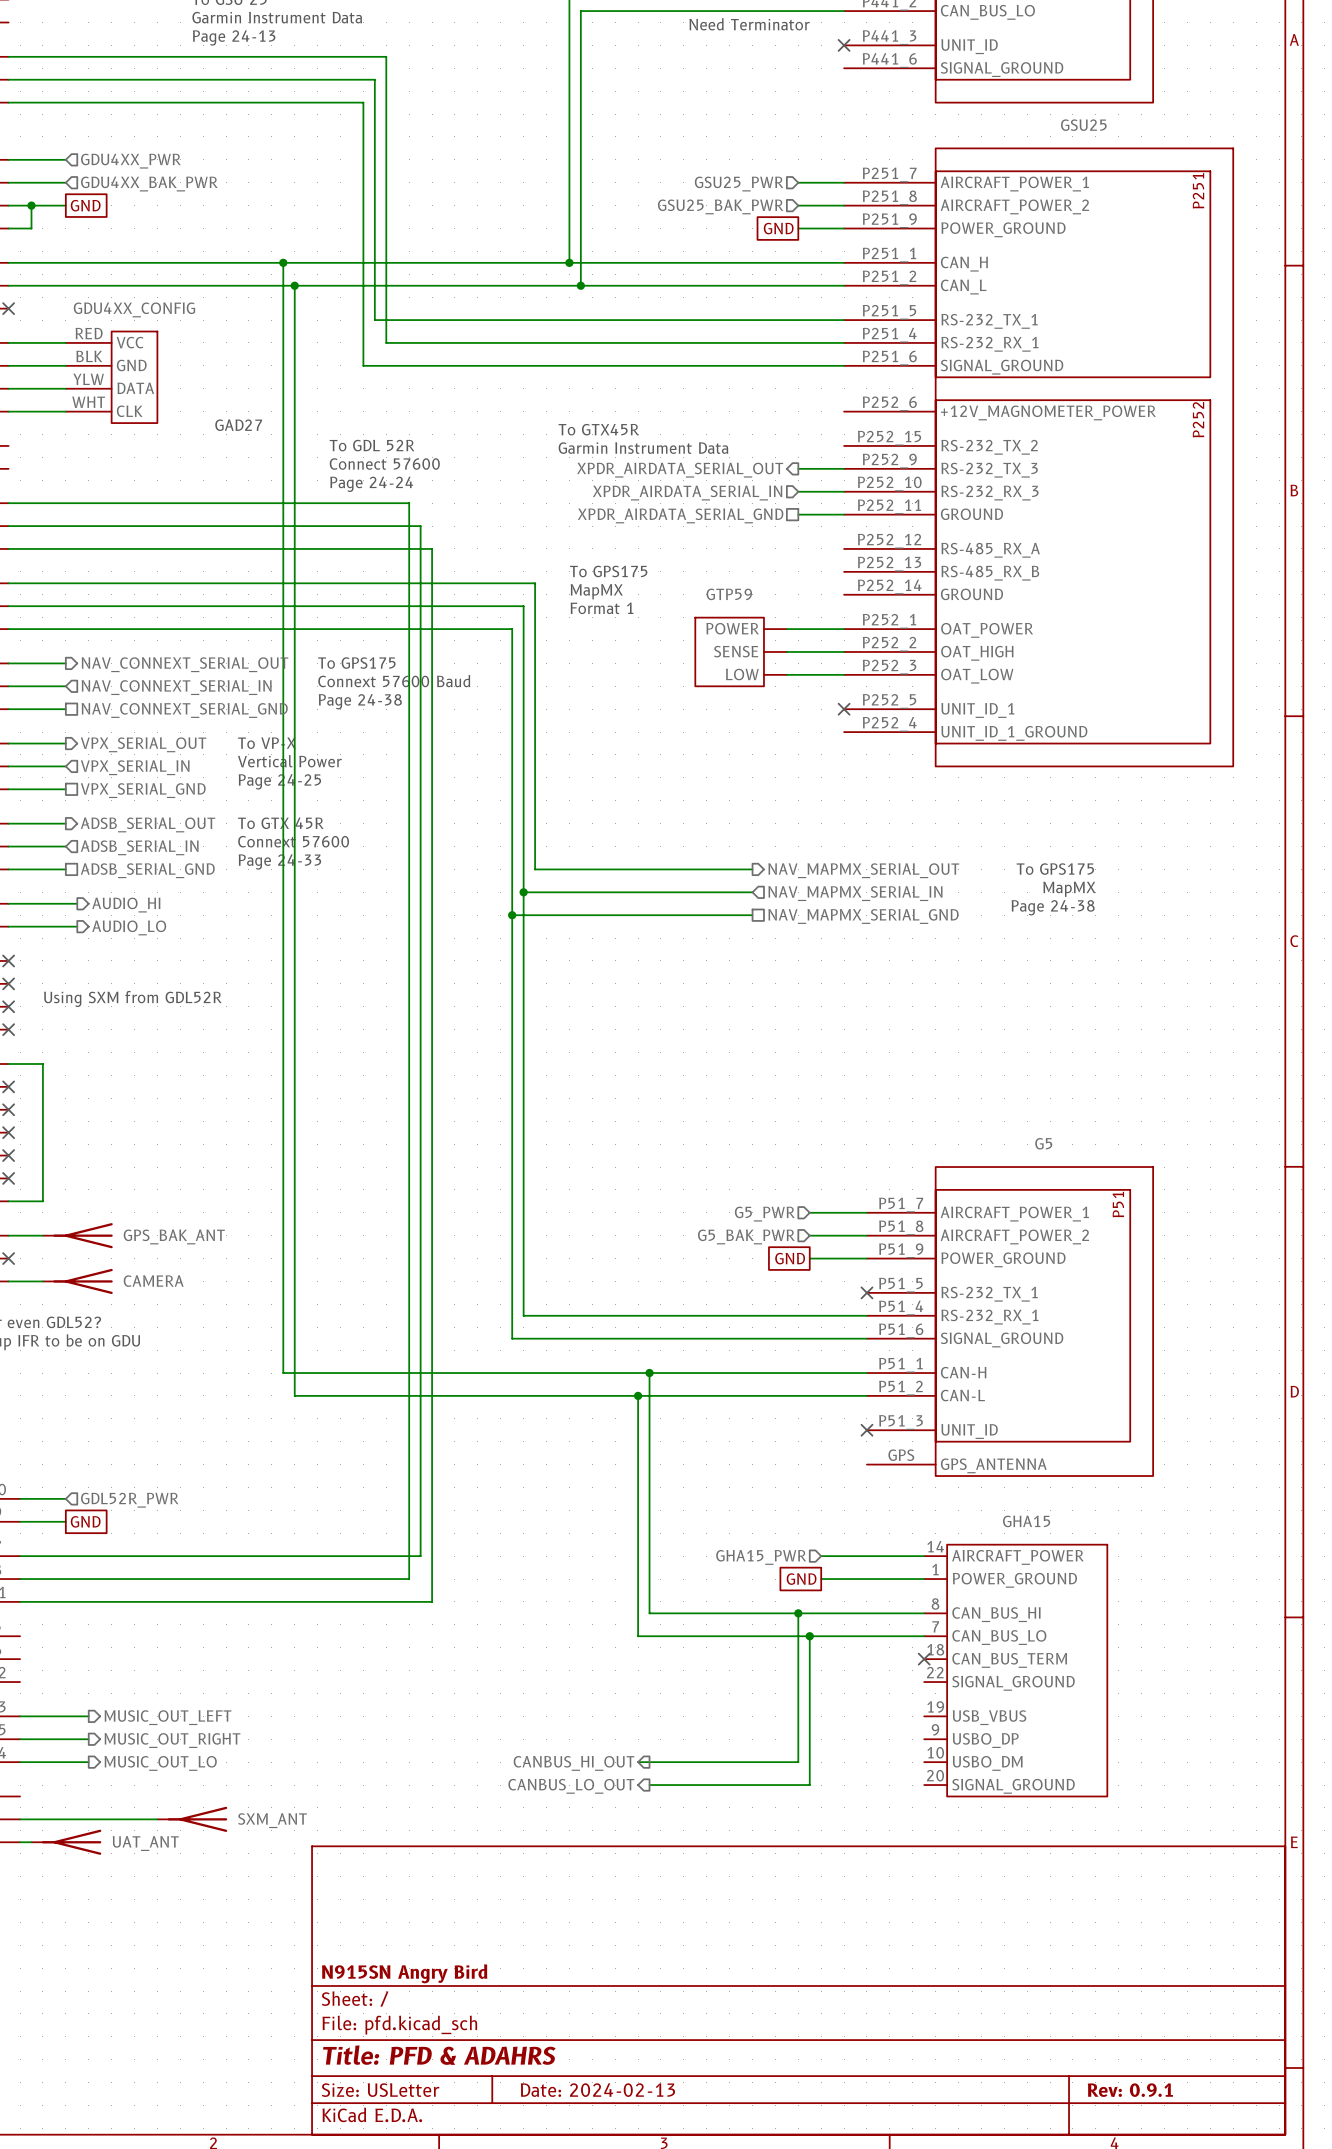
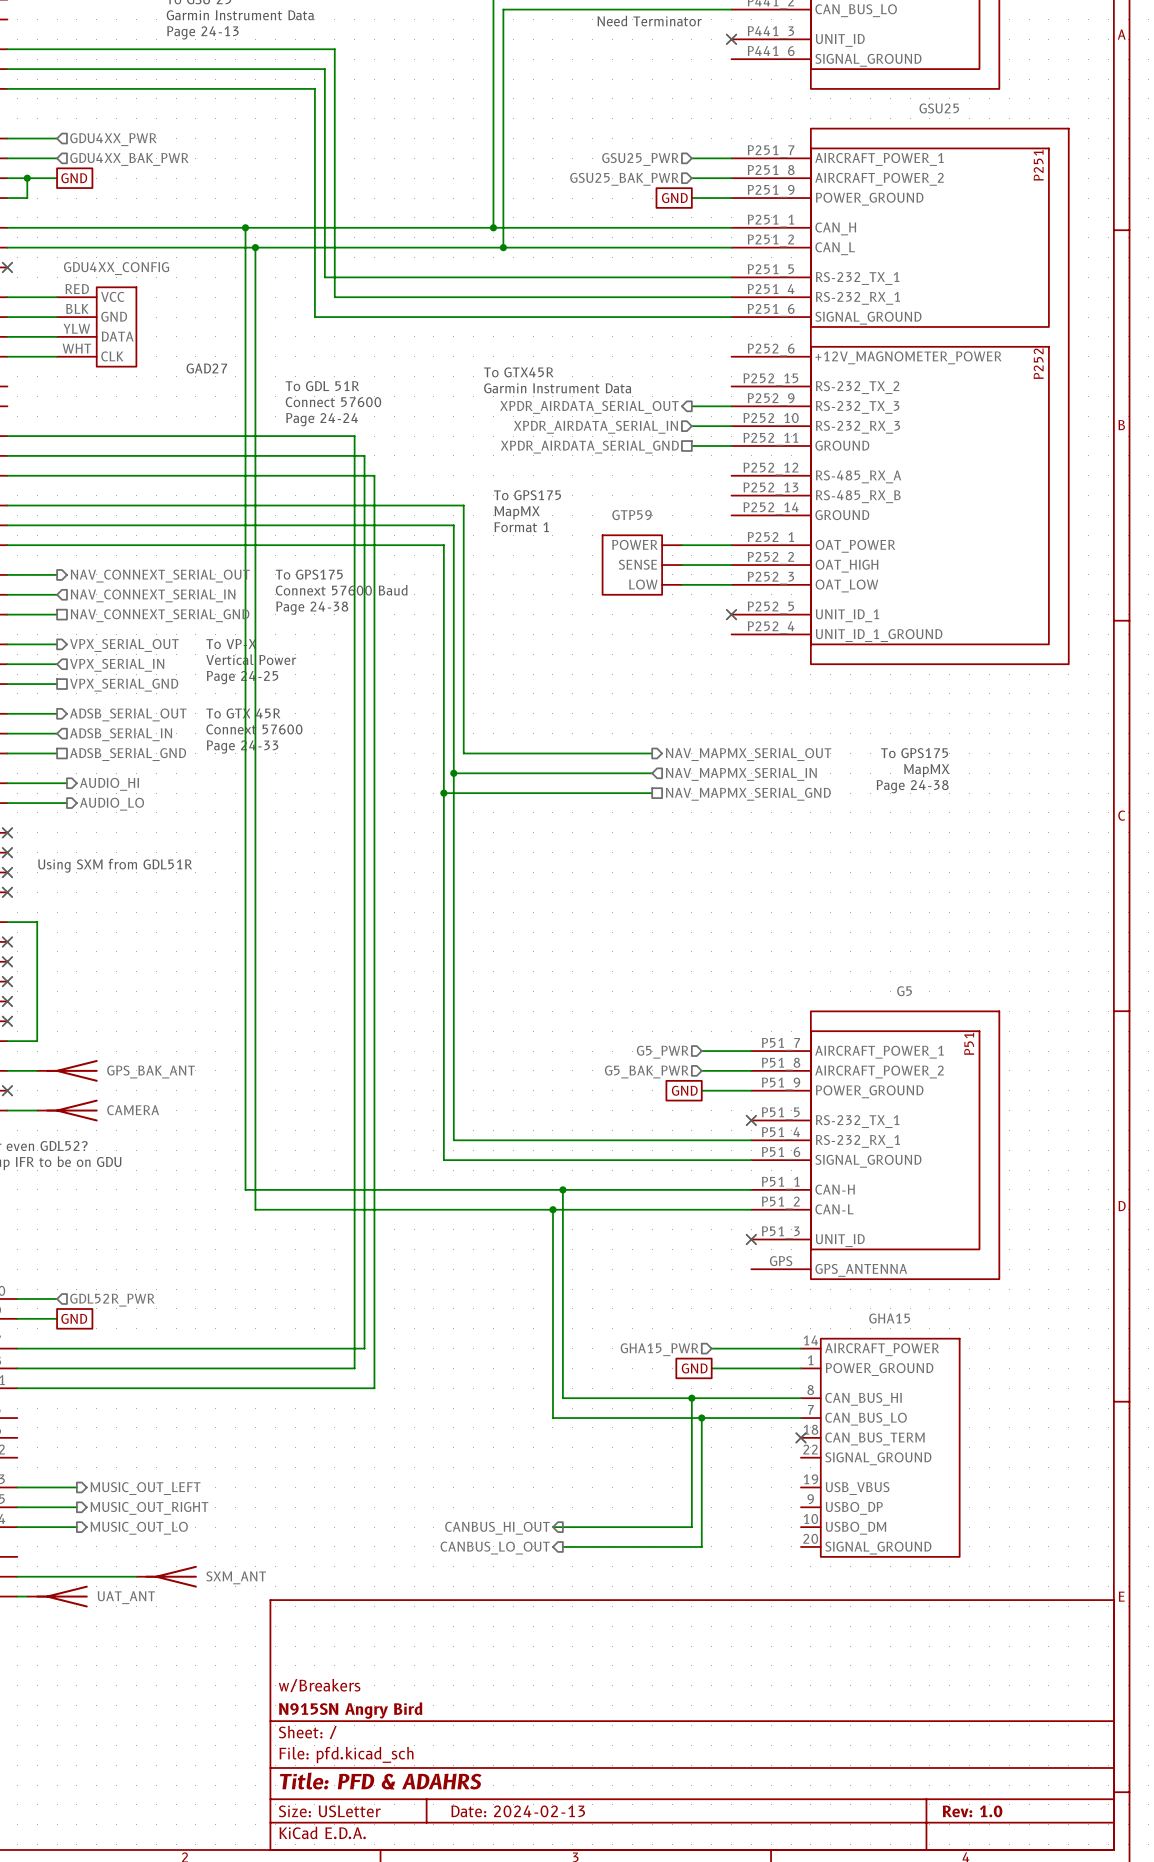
text: To GDL 52R (372, 445) -> To GDL 51R (322, 386)
text: Using SXM from GDL52R (132, 998) -> Using SXM from GDL51R (115, 865)
title block: none -> w/Breakers (319, 1685)
title block: Rev: 0.9.1 (1130, 2090) -> Rev: 1.0 (972, 1811)

